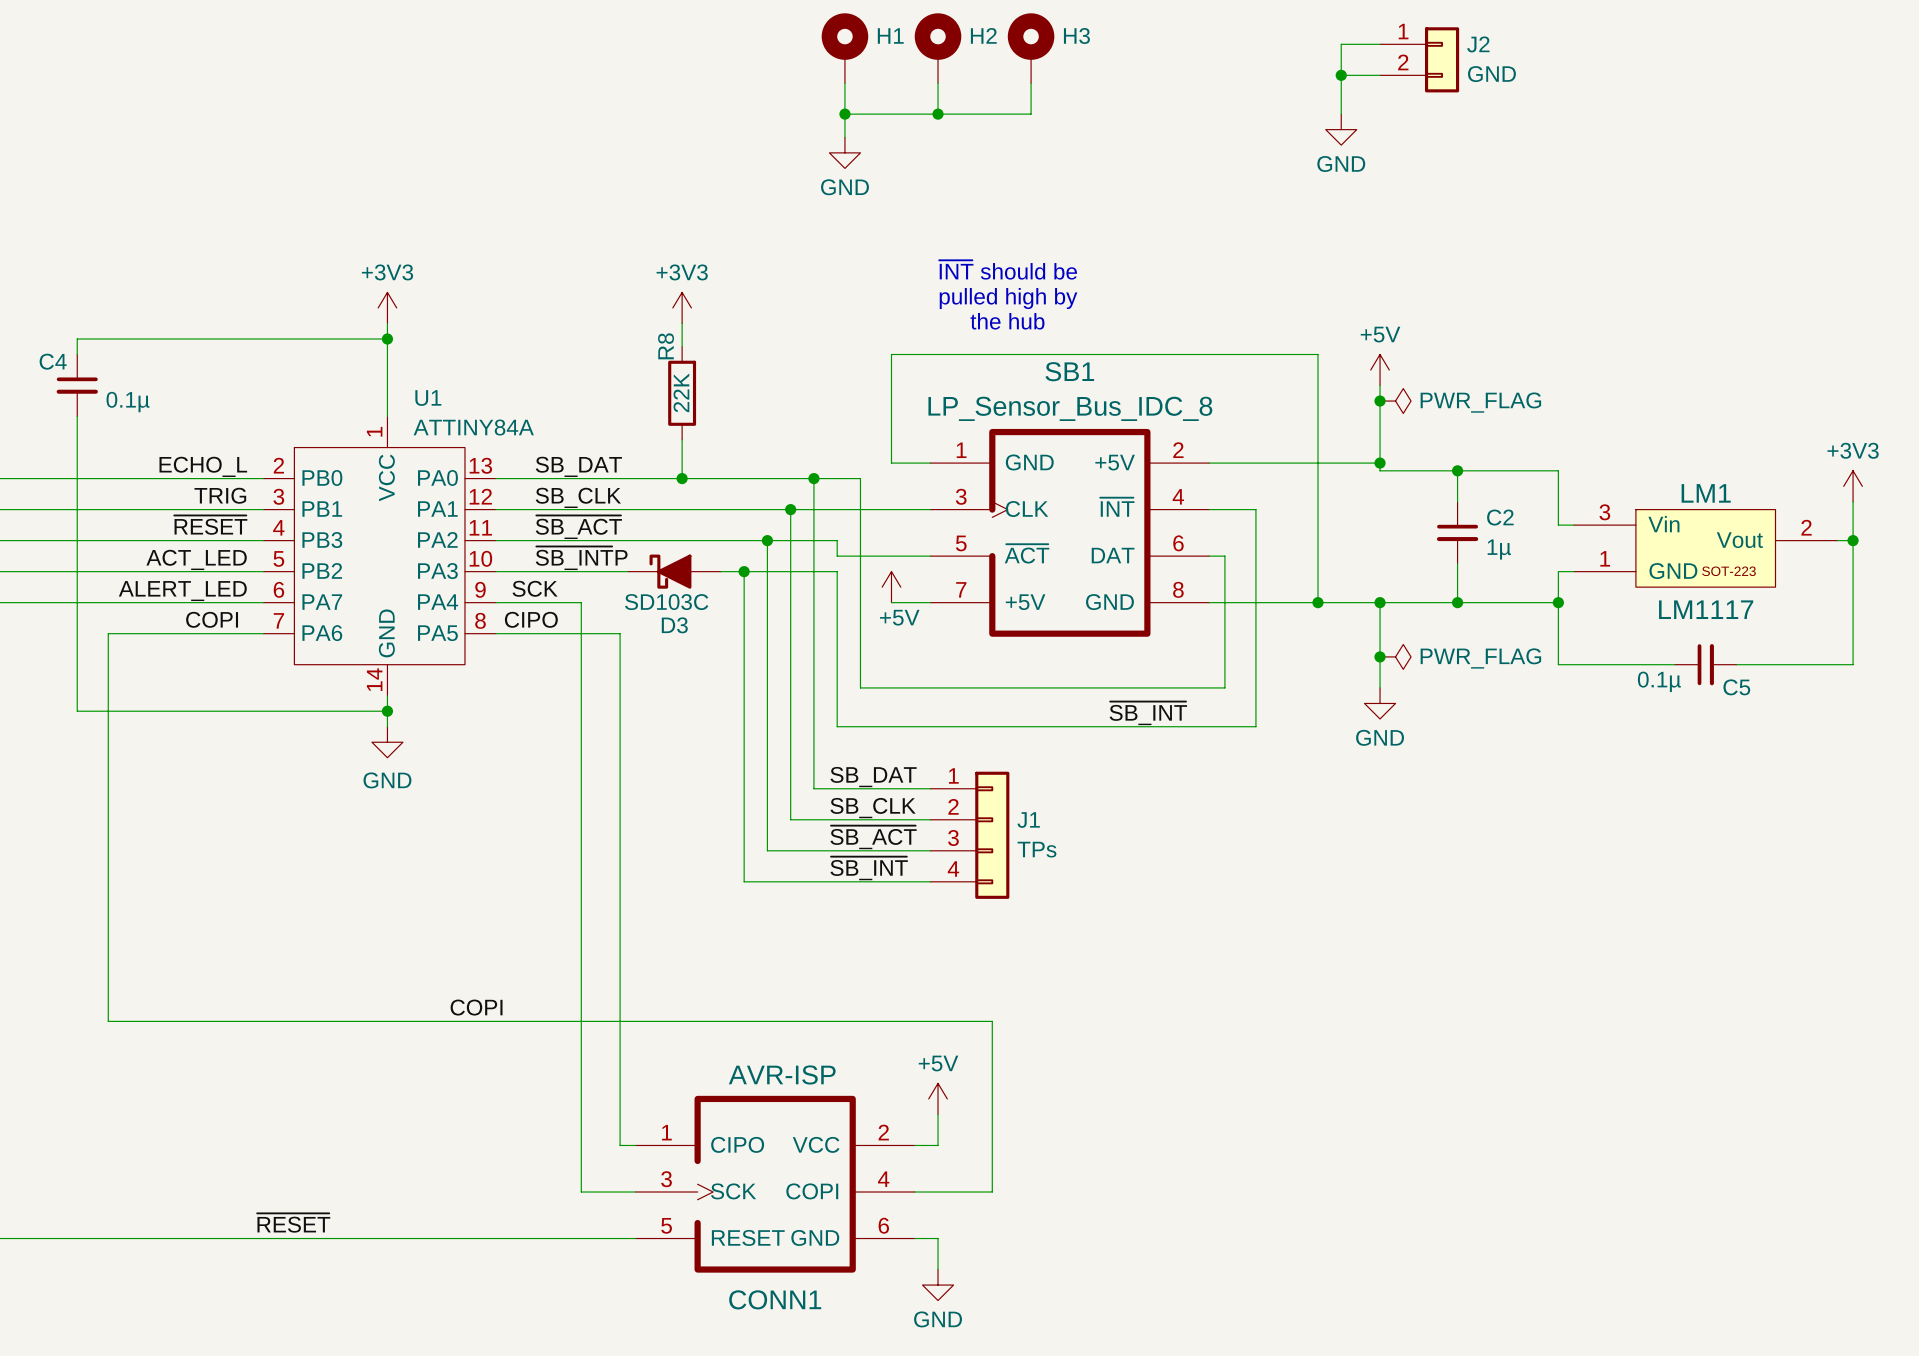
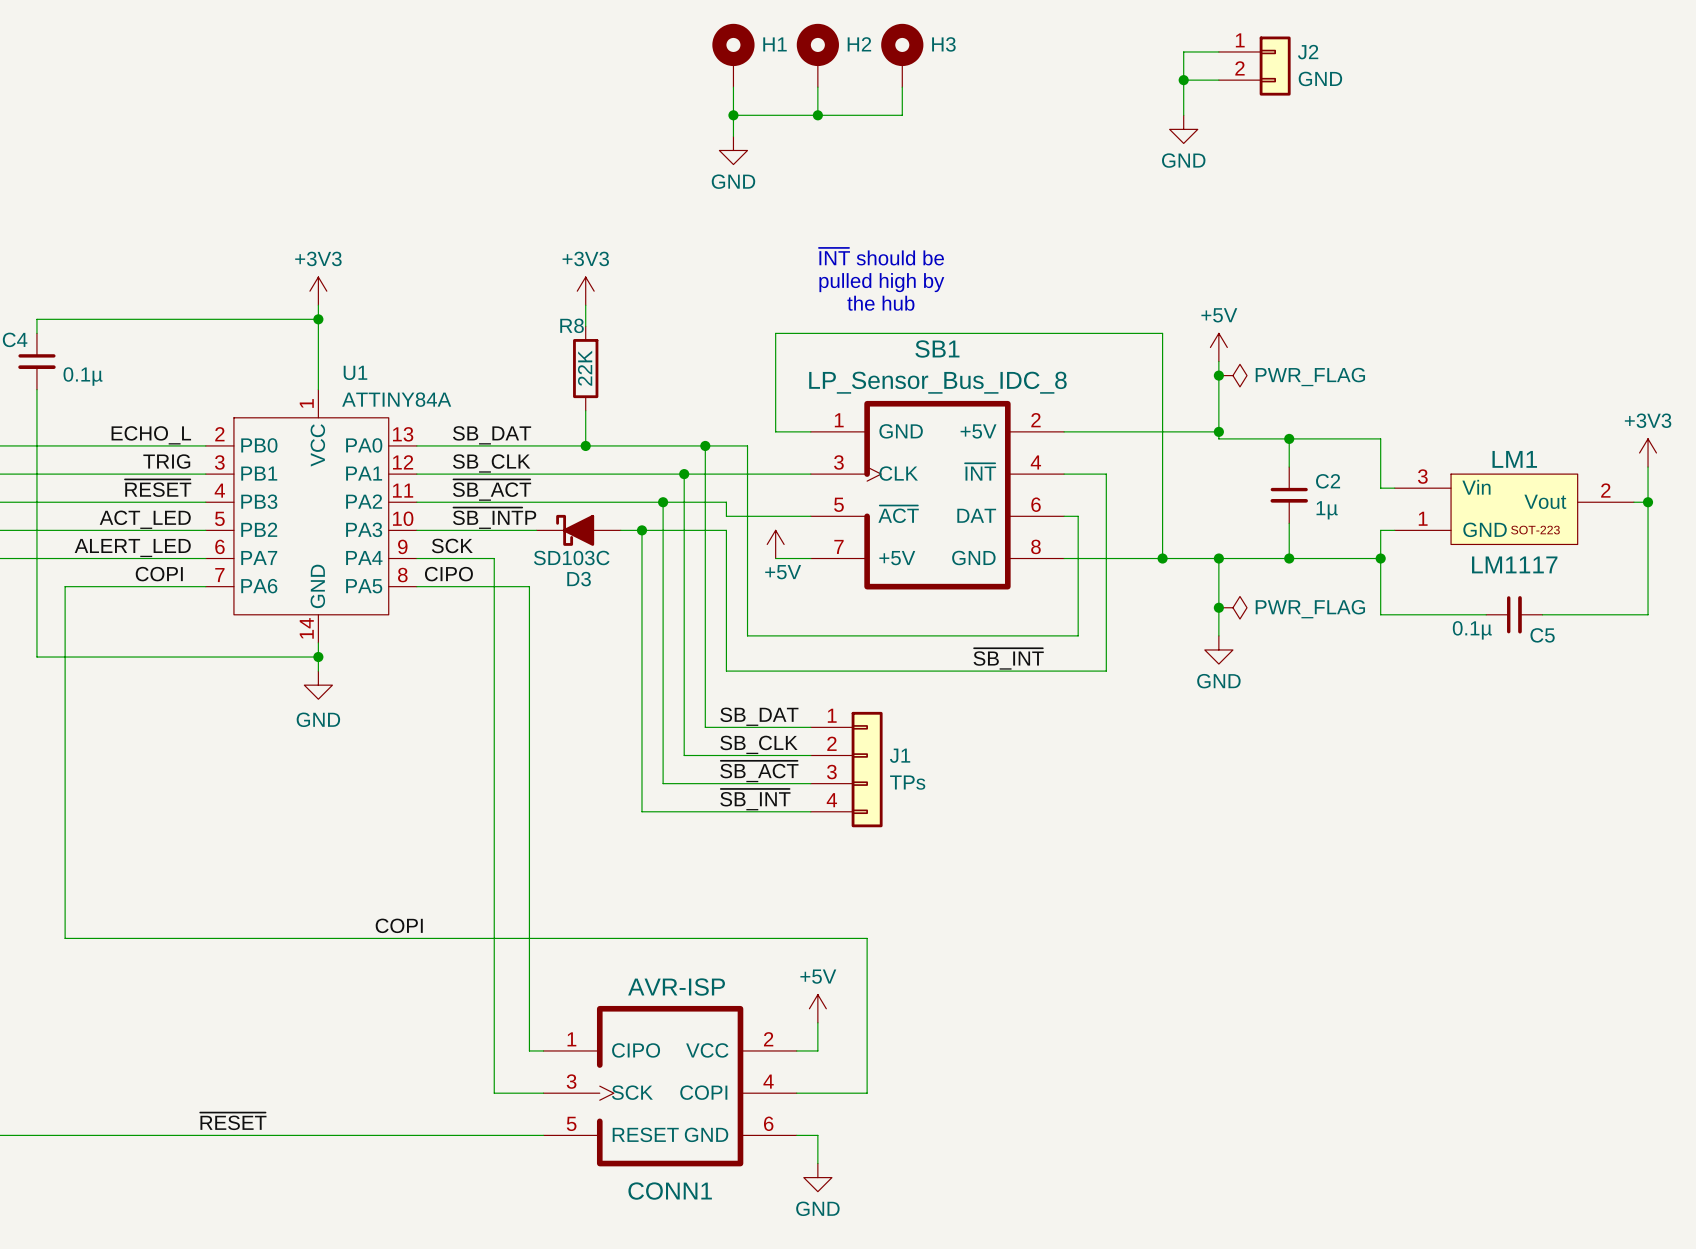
R8 name rotation: 0° (666, 346) -> 90° clockwise (572, 325)

